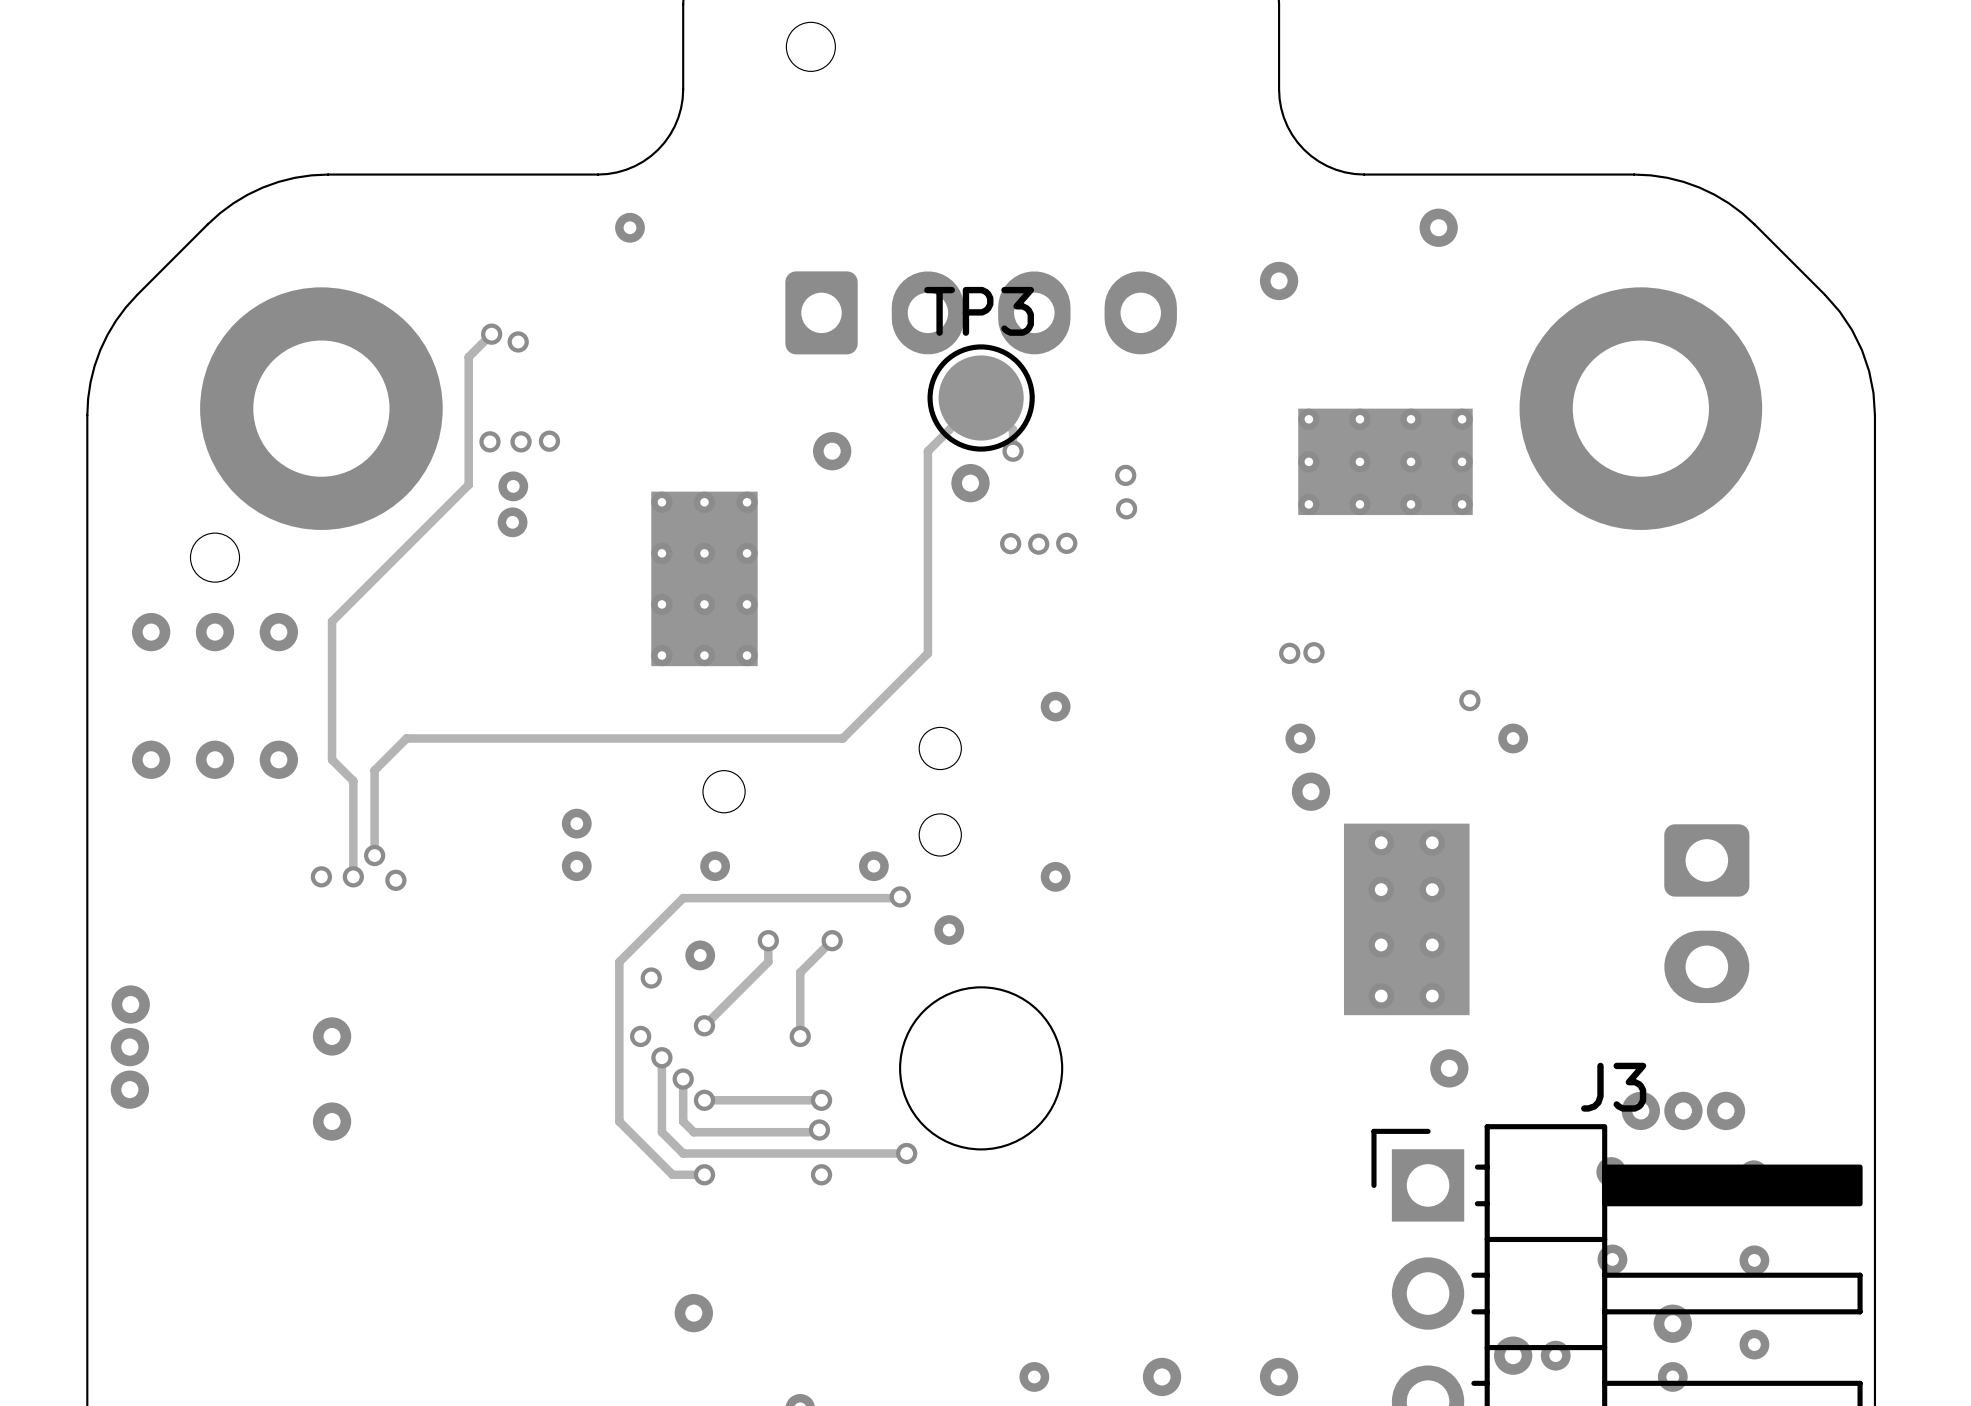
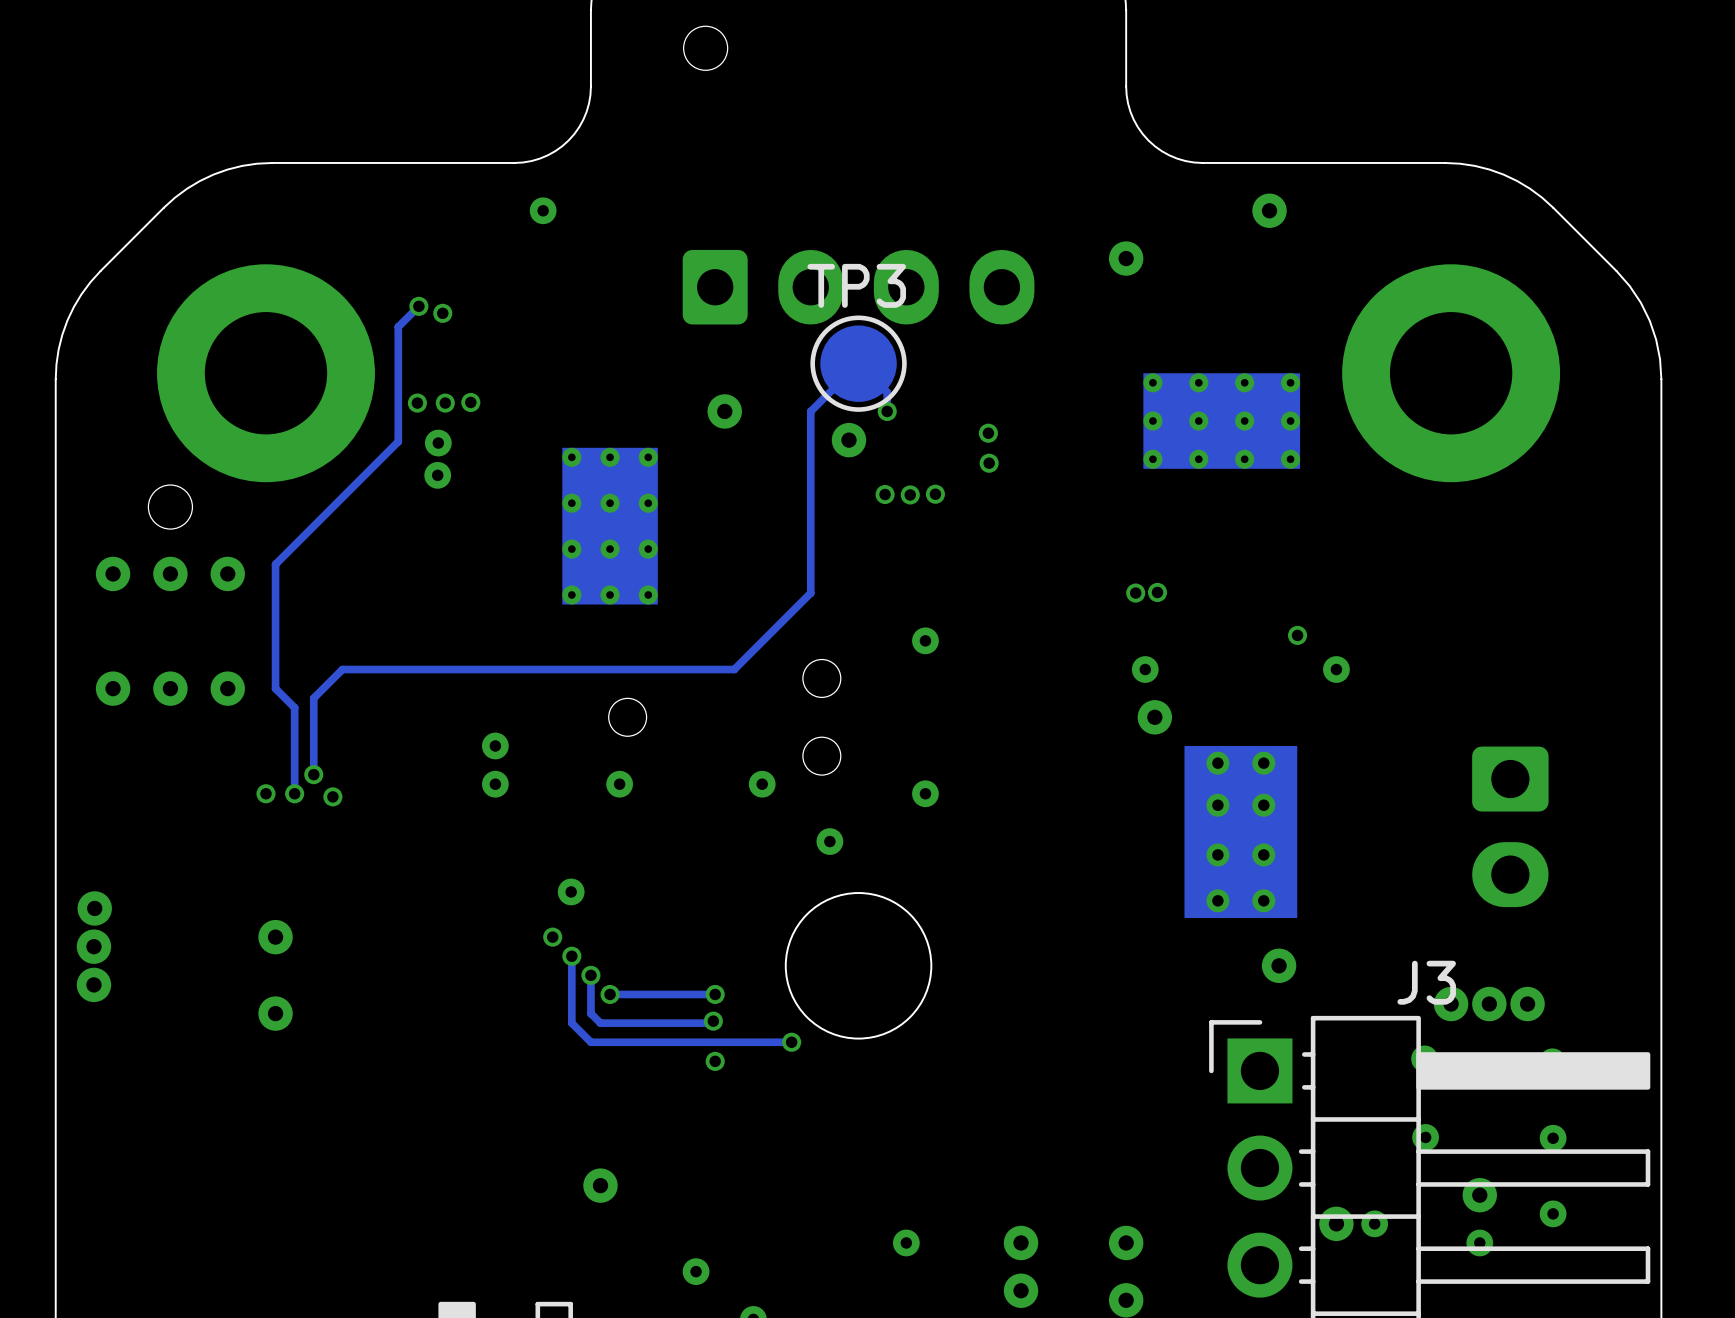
track: (900, 896) (683, 898) (619, 961) (619, 1121) (672, 1174) (704, 1174) -> none
via: (900, 896) -> none
track: (768, 940) (768, 961) (704, 1025) -> none
via: (768, 940) -> none
track: (832, 940) (800, 972) (800, 1036) -> none
via: (832, 940) -> none
via position: (700, 955) -> (571, 891)
via: (651, 978) -> none
via: (704, 1025) -> none
via: (800, 1036) -> none
via: (704, 1174) -> none

